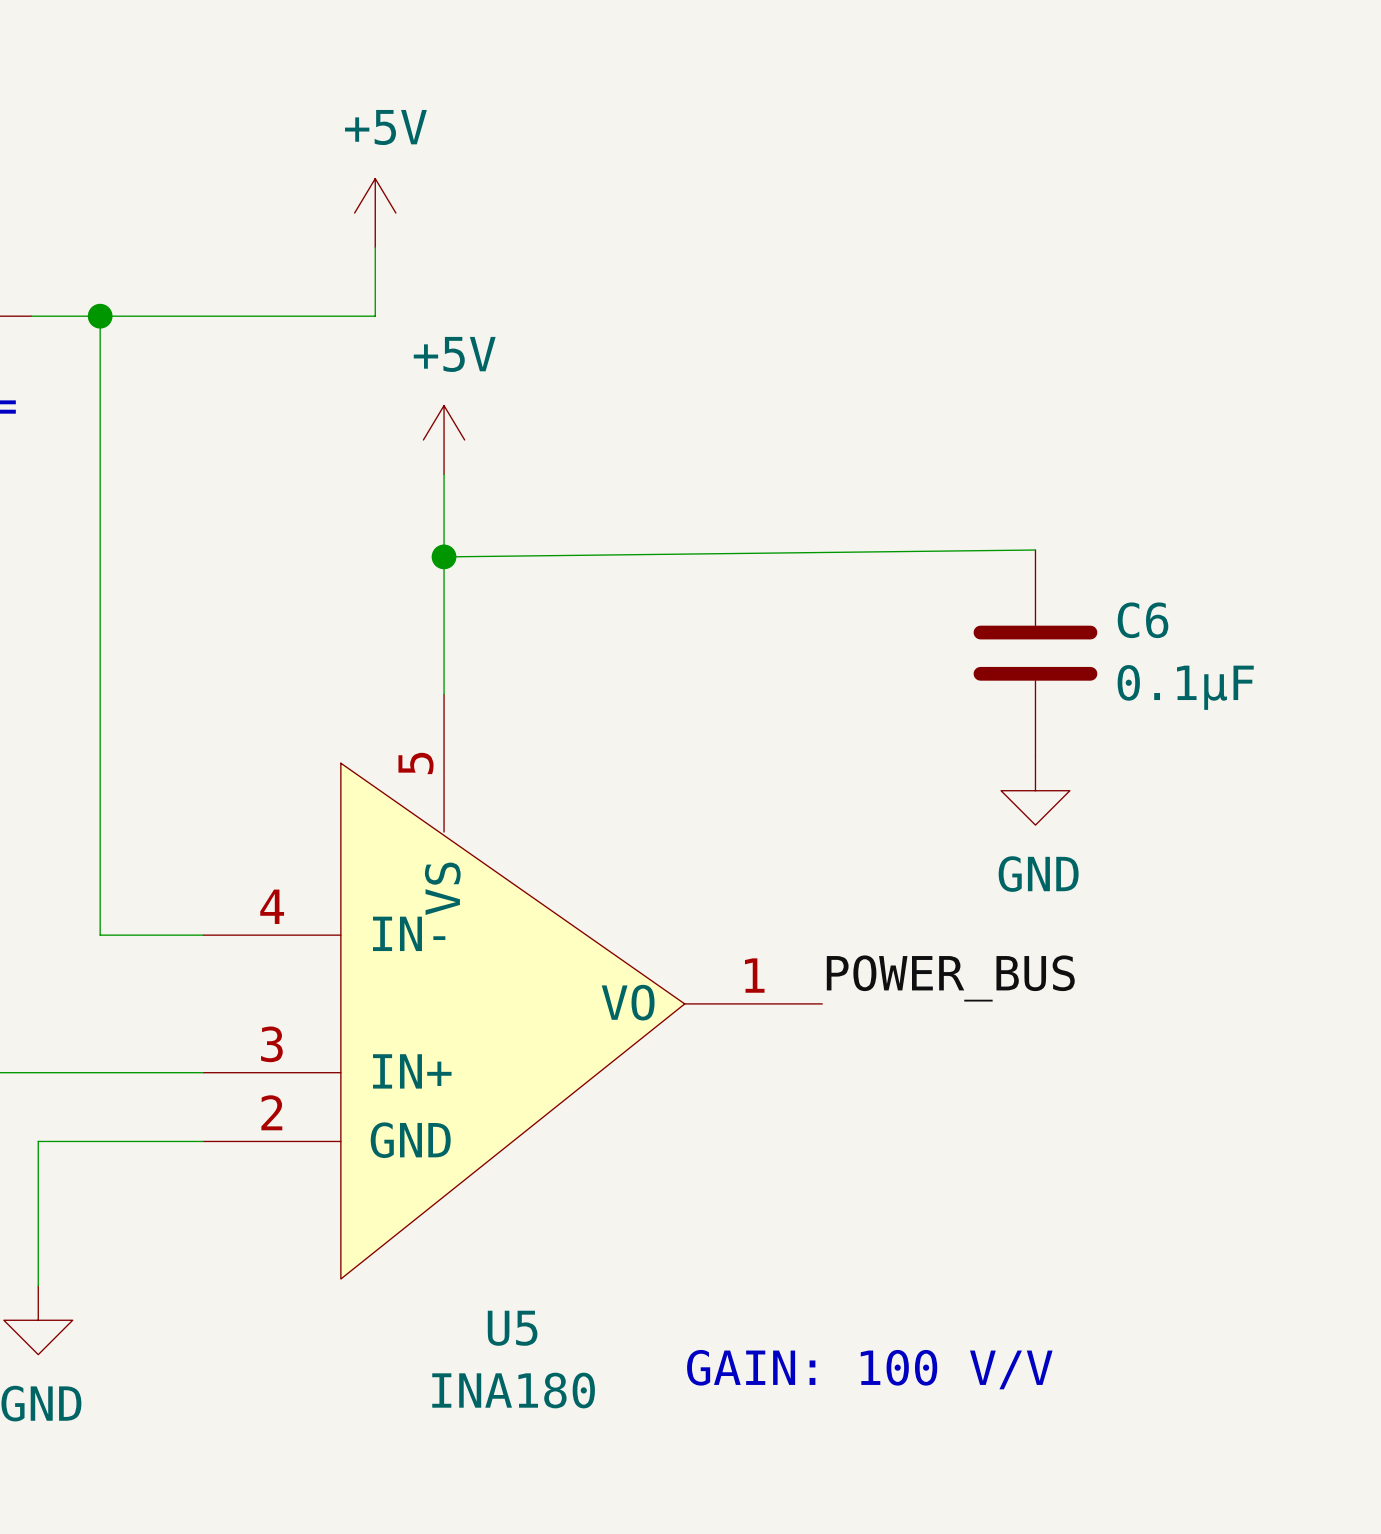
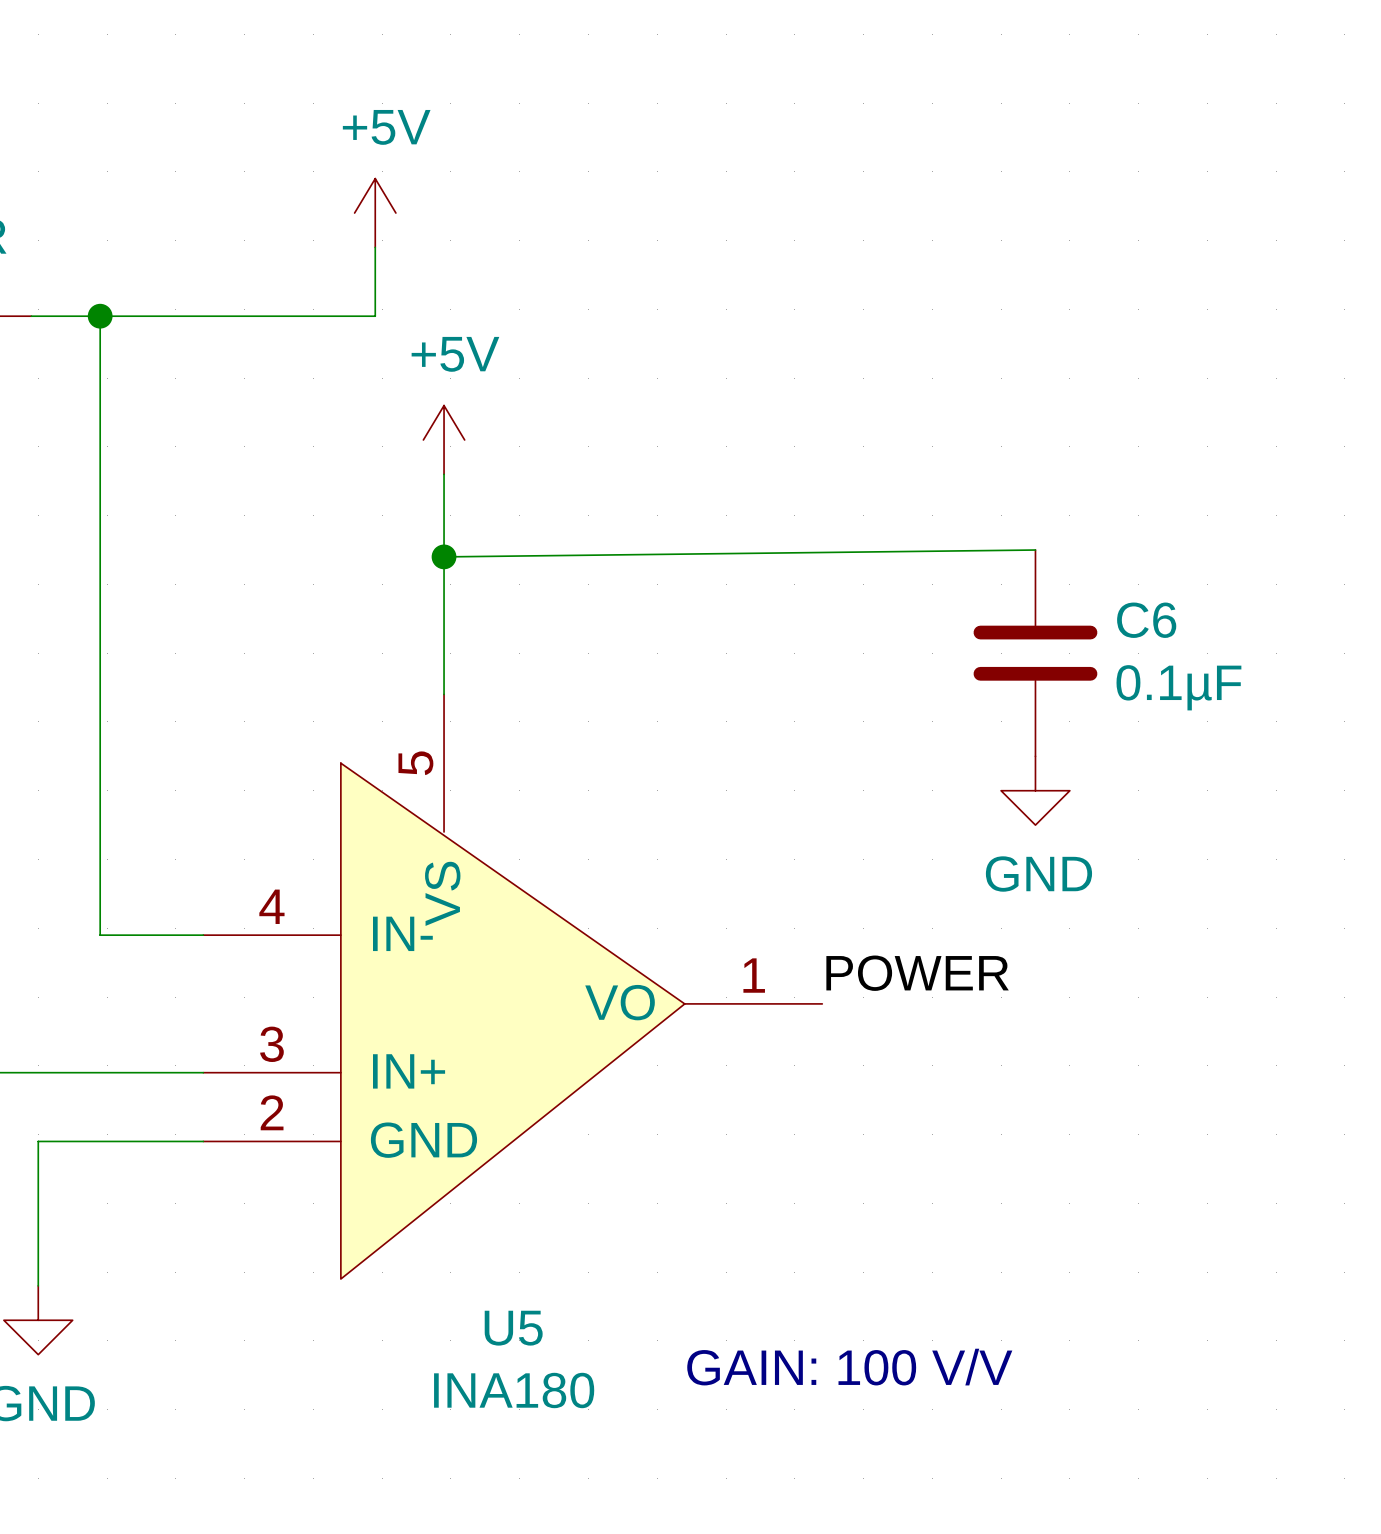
label: POWER_BUS (950, 978) -> POWER (917, 973)

